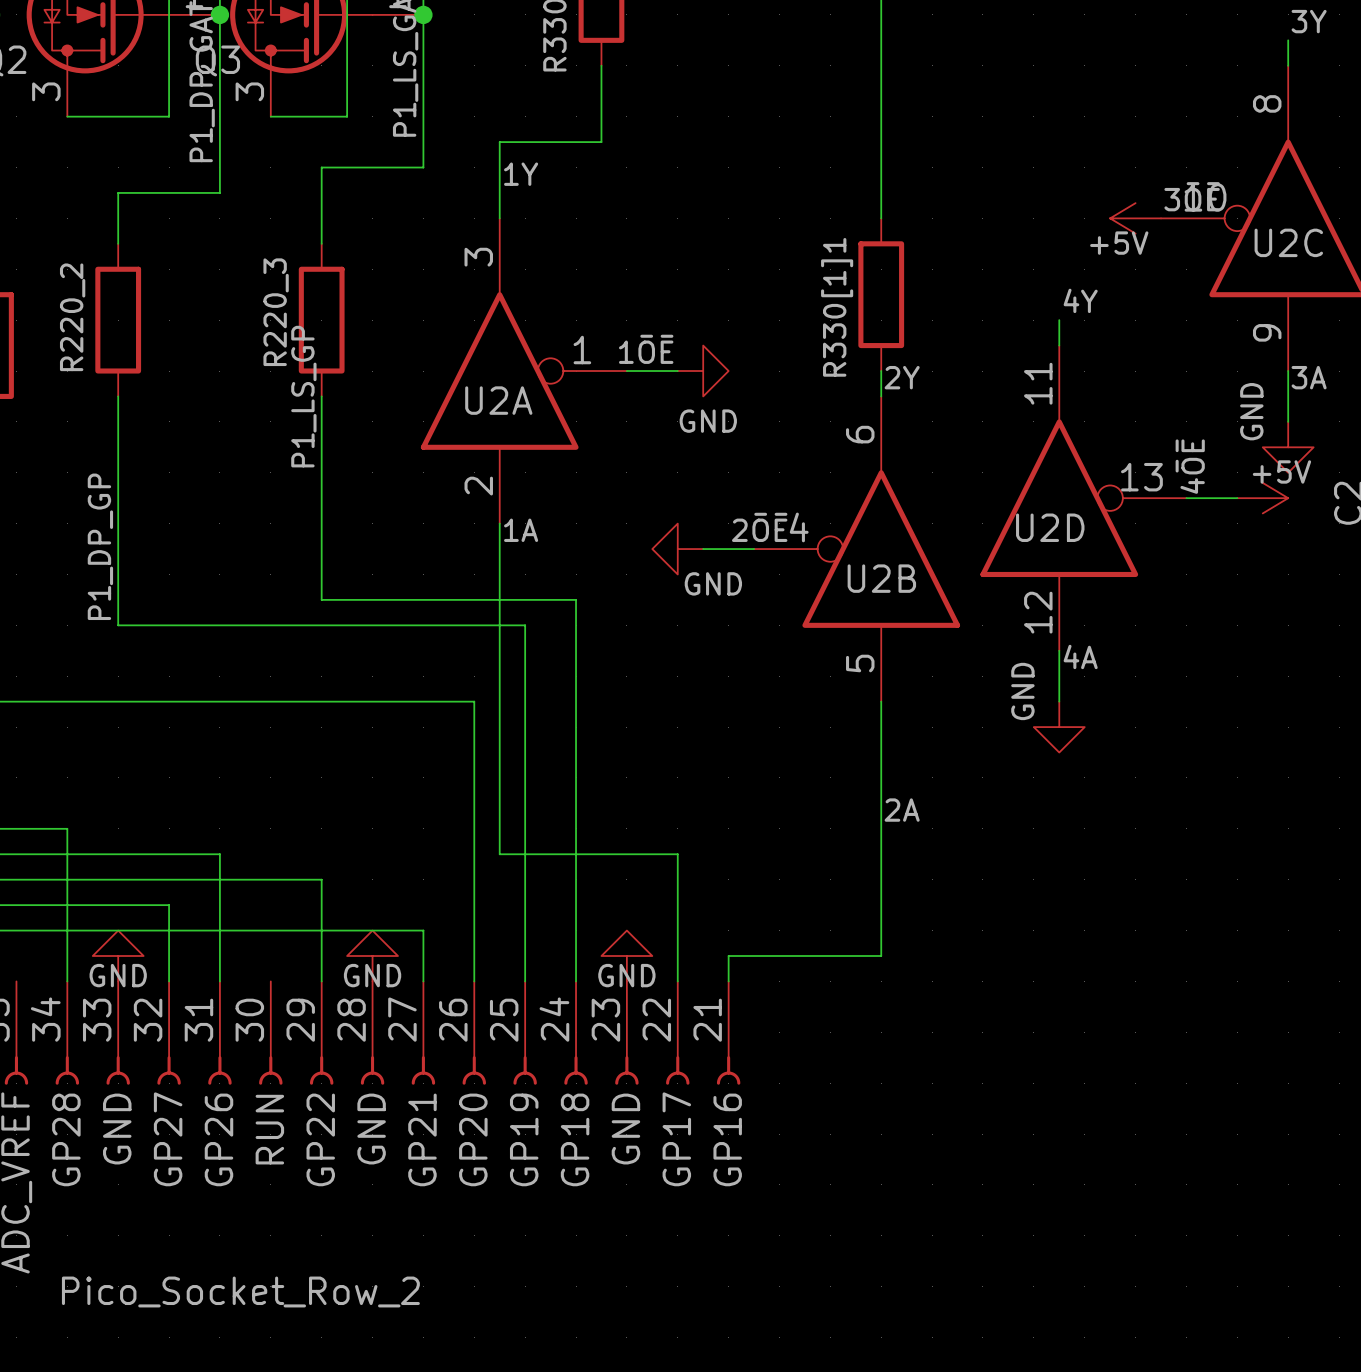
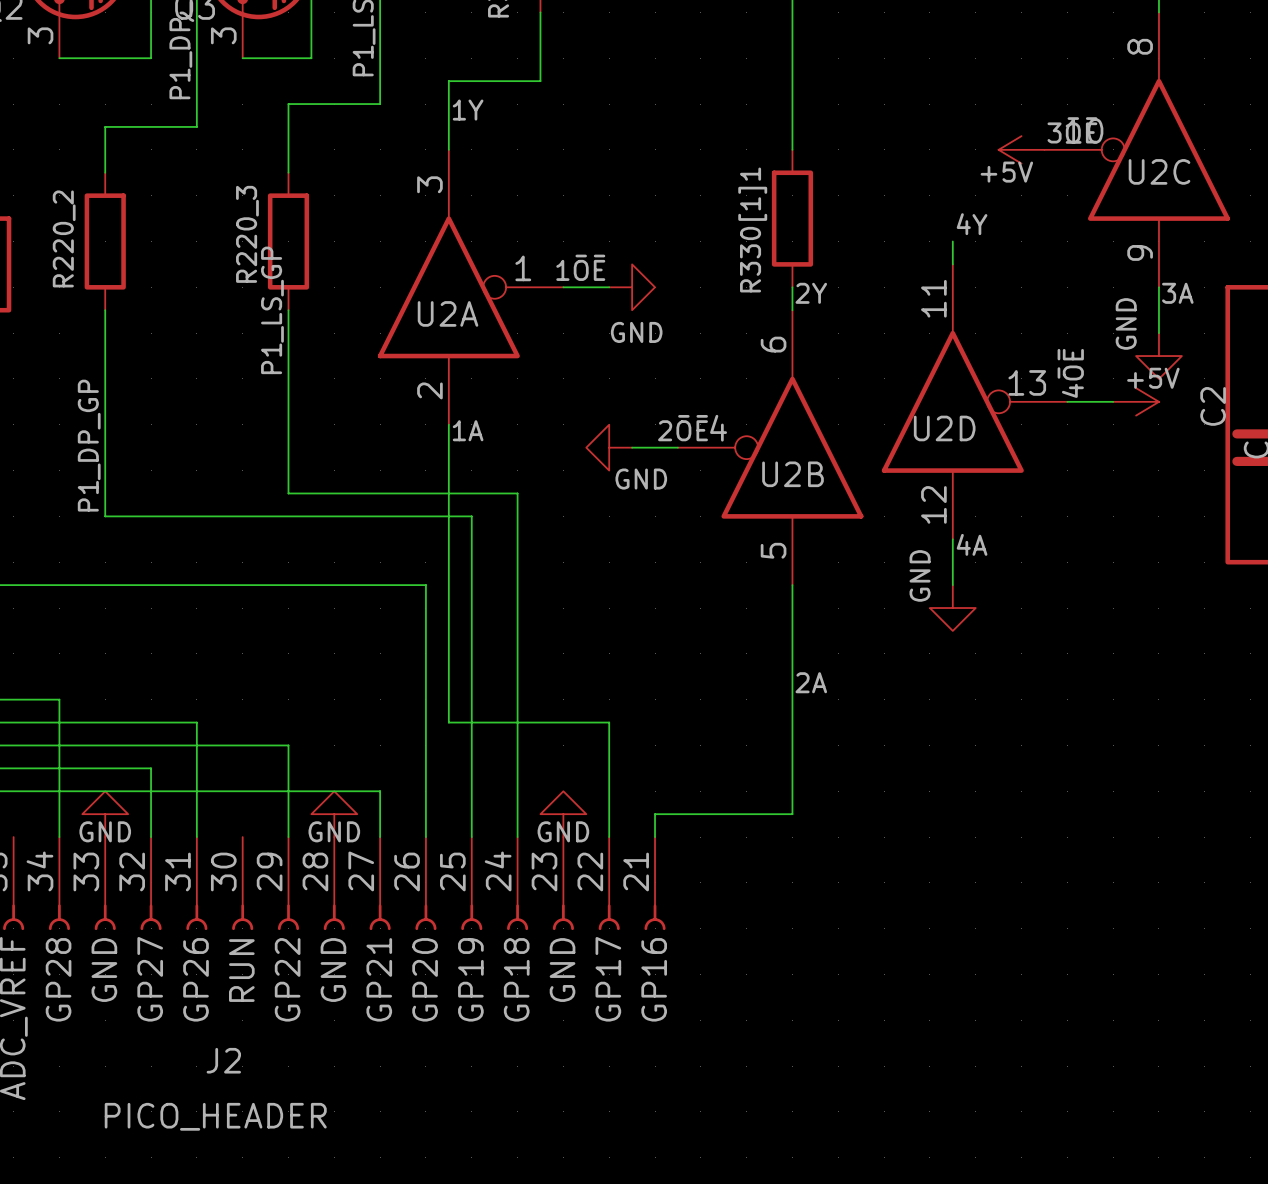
J2 name: none -> J2 (223, 1060)
J2 value: Pico_Socket_Row_2 (240, 1291) -> PICO_HEADER (215, 1116)

